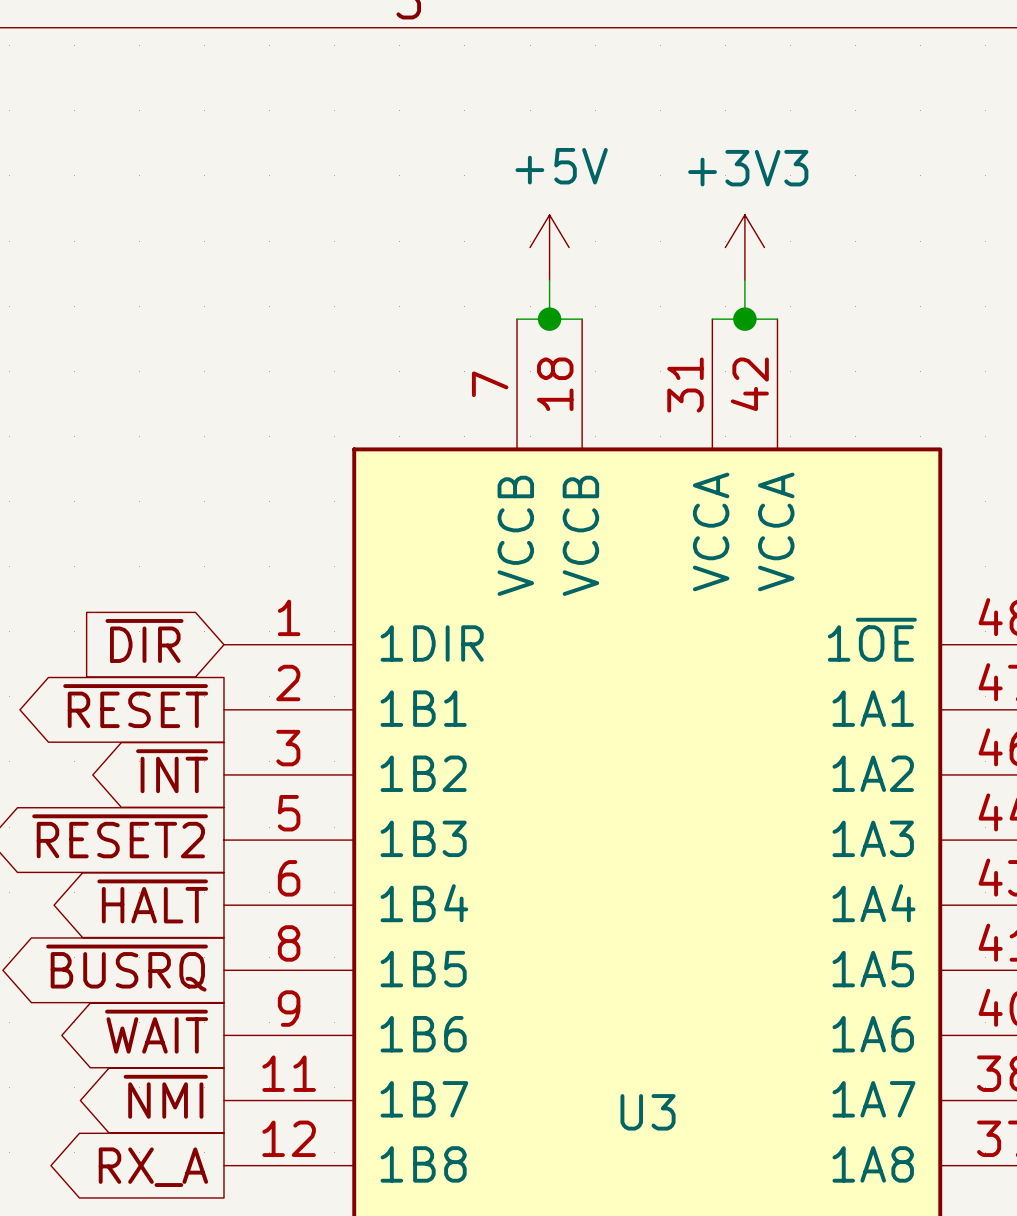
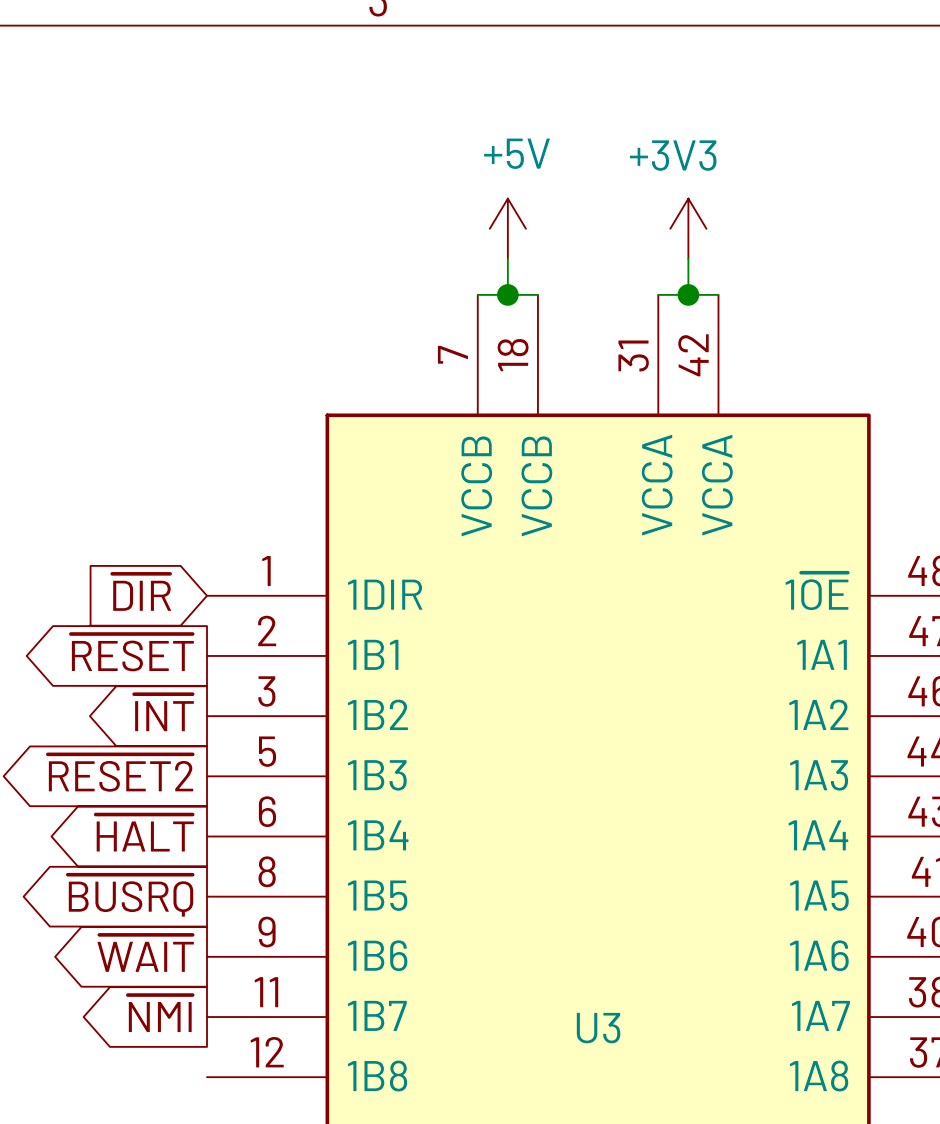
global label: RX_A (153, 1167) -> none

